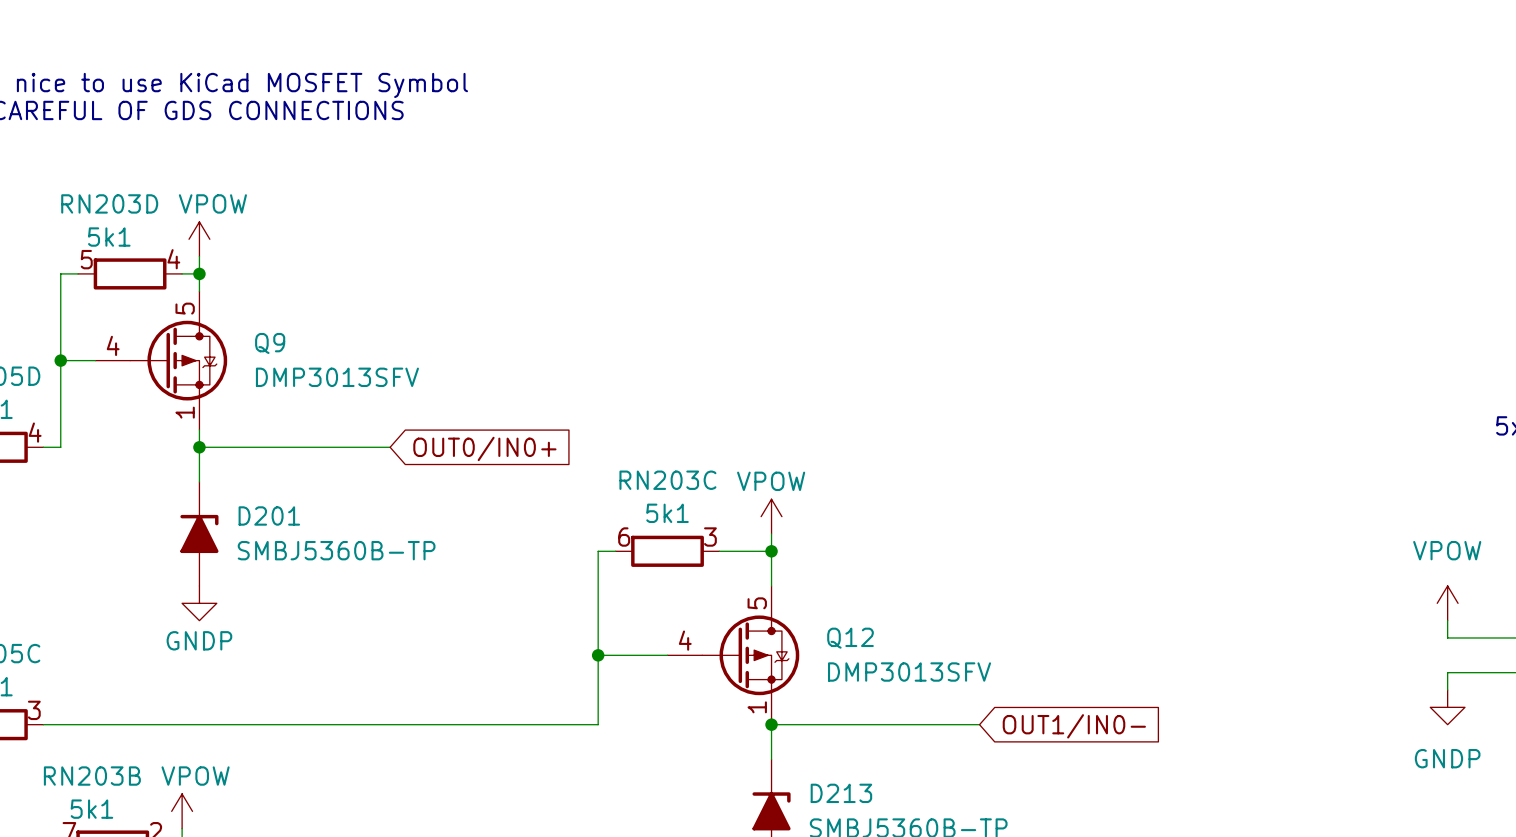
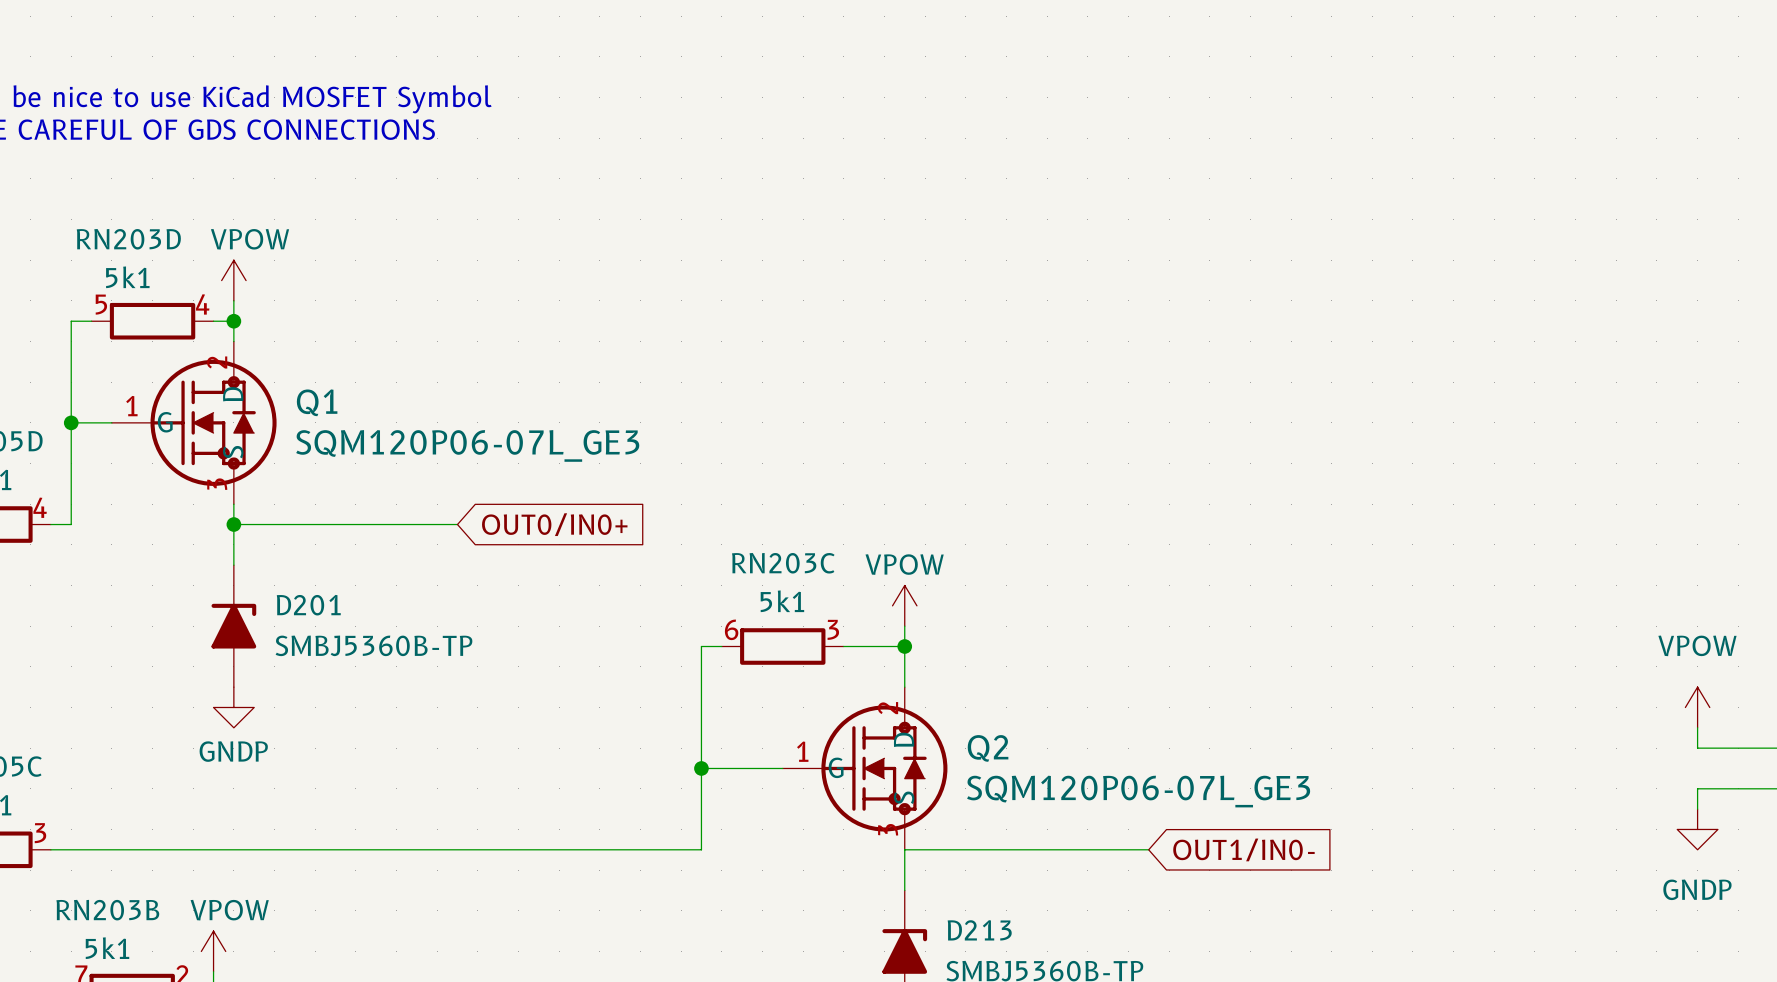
Q9: DMP3013SFV (161, 360) -> none
Q1: none -> SQM120P06-07L_GE3 (194, 422)
Q12: DMP3013SFV (733, 655) -> none
Q2: none -> SQM120P06-07L_GE3 (865, 768)
junction: (771, 724) -> none

